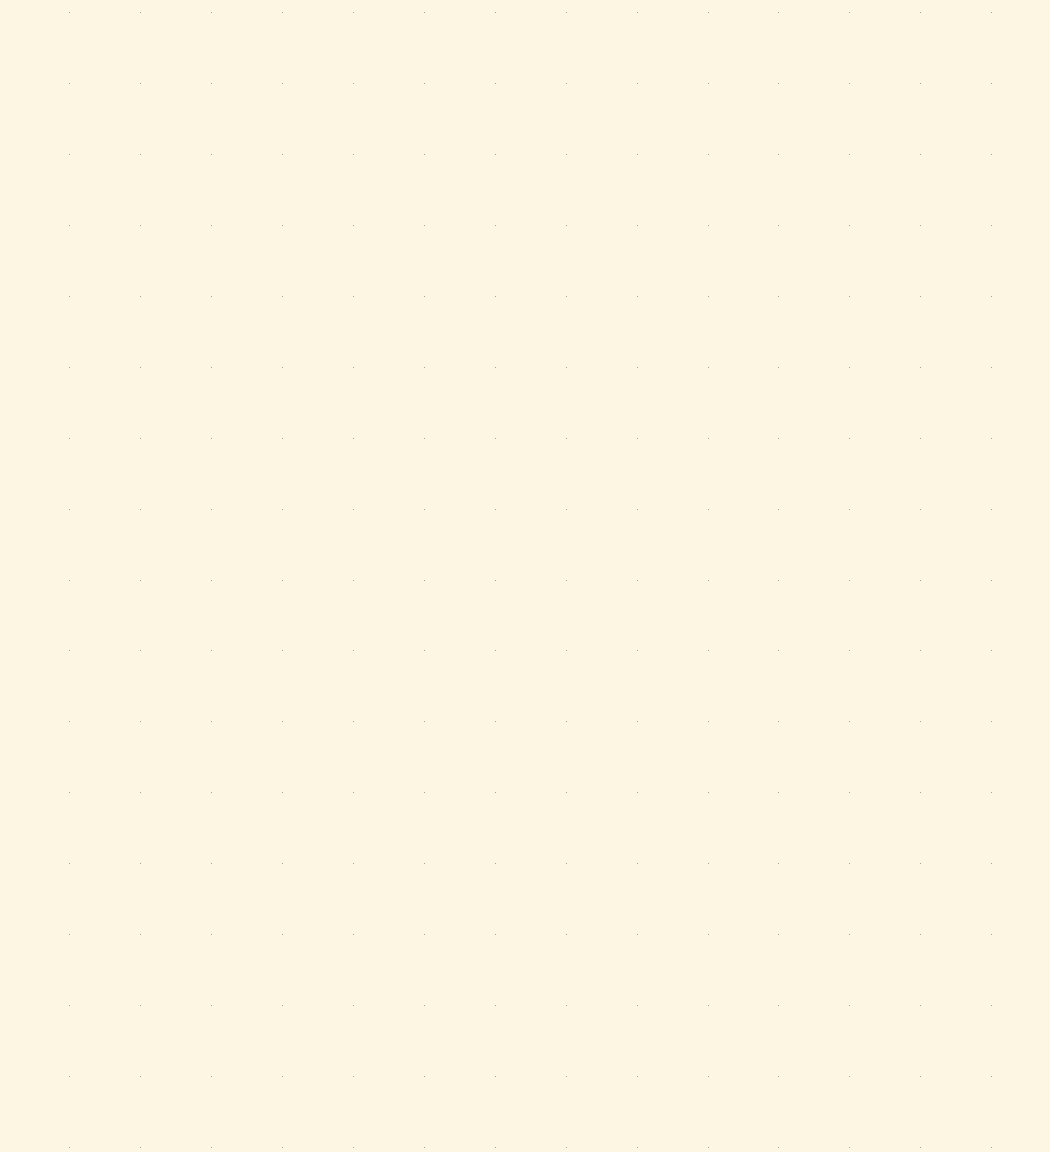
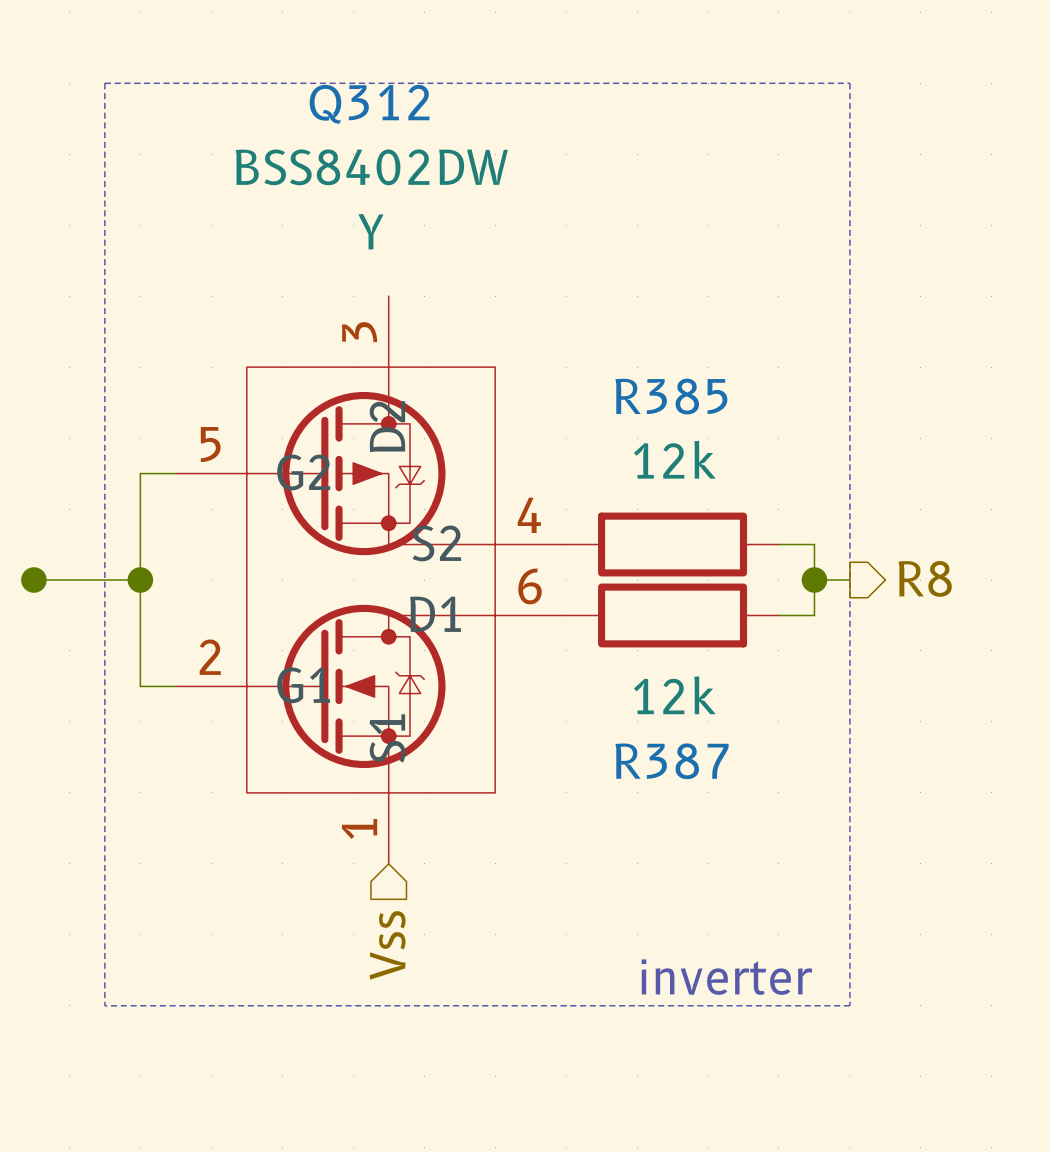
line: none -> (104, 83) (849, 83) (849, 1005) (104, 1005) (104, 83)
wire: none -> (175, 473) (140, 473) (140, 686) (175, 686)
R385: none -> 12k (672, 544)
wire: none -> (778, 544) (814, 544) (814, 615) (778, 615)
hierarchical label: none -> R8 (925, 578)
wire: none -> (33, 580) (140, 580)
junction: none -> (33, 580)
junction: none -> (140, 580)
Q312: none -> BSS8402DW (370, 580)
wire: none -> (814, 580) (849, 580)
junction: none -> (814, 580)
R387: none -> 12k (672, 615)
hierarchical label: none -> Vss (387, 945)
text: none -> inverter (726, 977)

